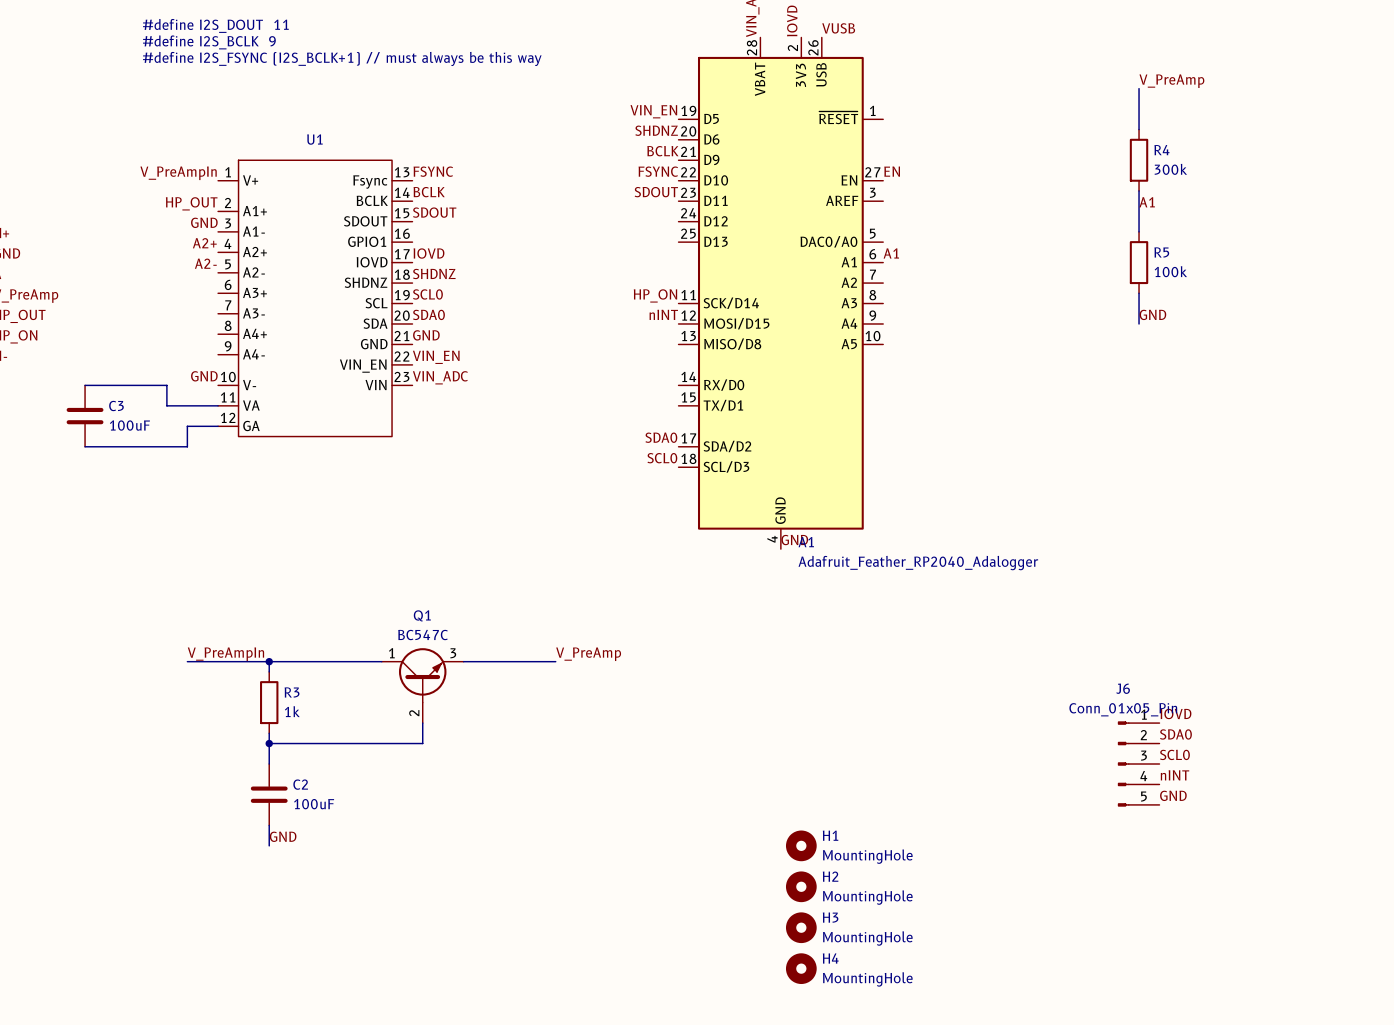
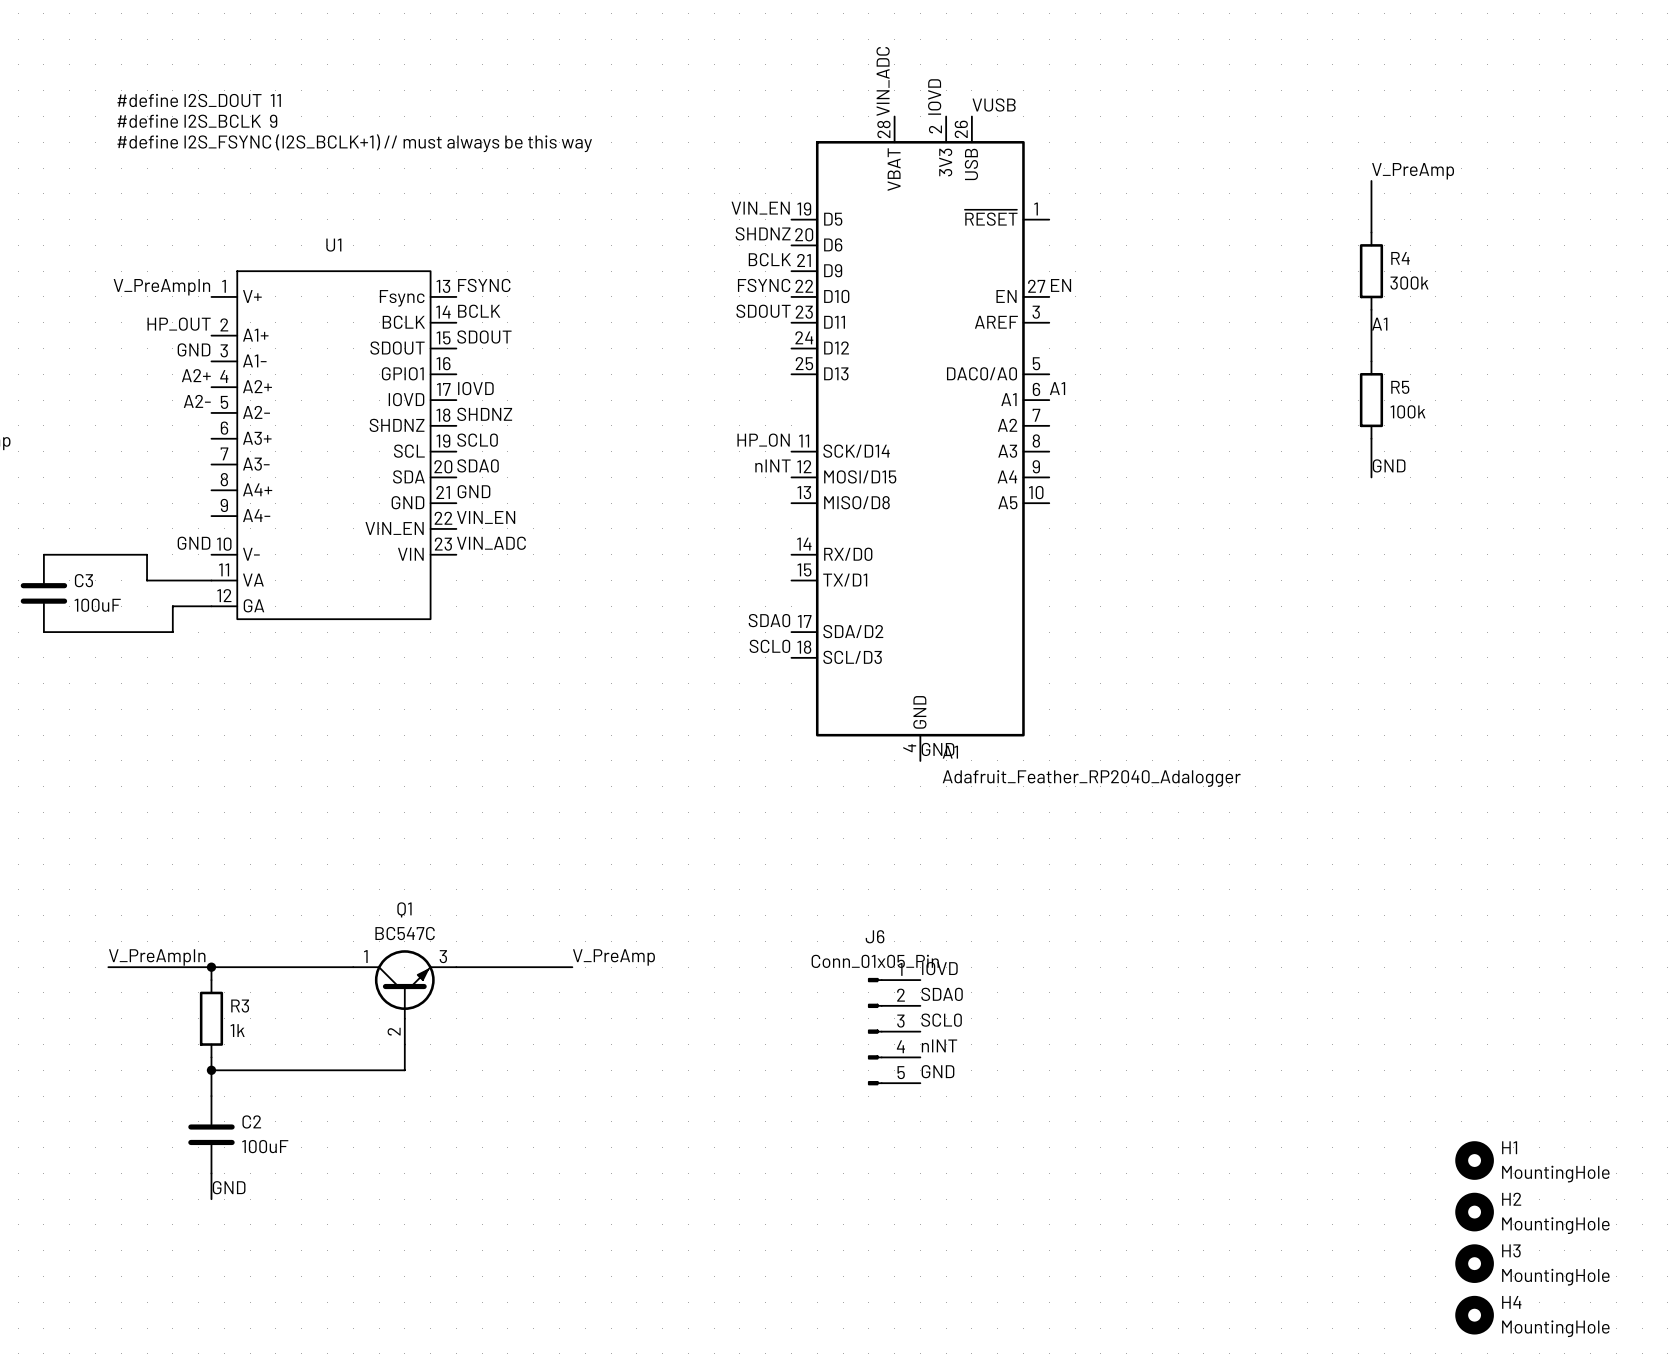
label position: V_PreAmpIn (225, 654) -> V_PreAmpIn (157, 957)
label position: V_PreAmp (588, 654) -> V_PreAmp (613, 957)
wire: (187, 661) (381, 661) -> (108, 967) (353, 967)
wire: (269, 661) (269, 671) -> (211, 967) (211, 980)
junction: (269, 661) -> none
wire: (463, 661) (555, 661) -> (456, 967) (572, 967)
Q1 position: (422, 685) -> (404, 997)
R3 position: (269, 702) -> (211, 1018)
junction: none -> (211, 967)
label: none -> IOVD (939, 968)
label: IOVD (1175, 714) -> none
wire: (422, 723) (422, 743) (269, 743) -> (404, 1044) (404, 1070) (211, 1070)
wire: (269, 733) (269, 764) -> (211, 1057) (211, 1096)
label: none -> SDA0 (942, 994)
label: SDA0 (1175, 734) -> none
junction: (269, 743) -> none
label: none -> SCL0 (941, 1020)
label: SCL0 (1174, 754) -> none
J6 position: (1138, 764) -> (894, 1031)
label: none -> nINT (939, 1045)
label: nINT (1175, 775) -> none
junction: none -> (211, 1070)
C2 position: (269, 794) -> (211, 1134)
label: none -> GND (938, 1071)
label: GND (1173, 795) -> none
wire: (269, 825) (269, 845) -> (211, 1173) (211, 1199)
label position: GND (283, 836) -> GND (229, 1187)
H1 position: (801, 845) -> (1474, 1160)
H2 position: (801, 886) -> (1474, 1212)
H3 position: (801, 927) -> (1474, 1263)
H4 position: (801, 968) -> (1474, 1315)

